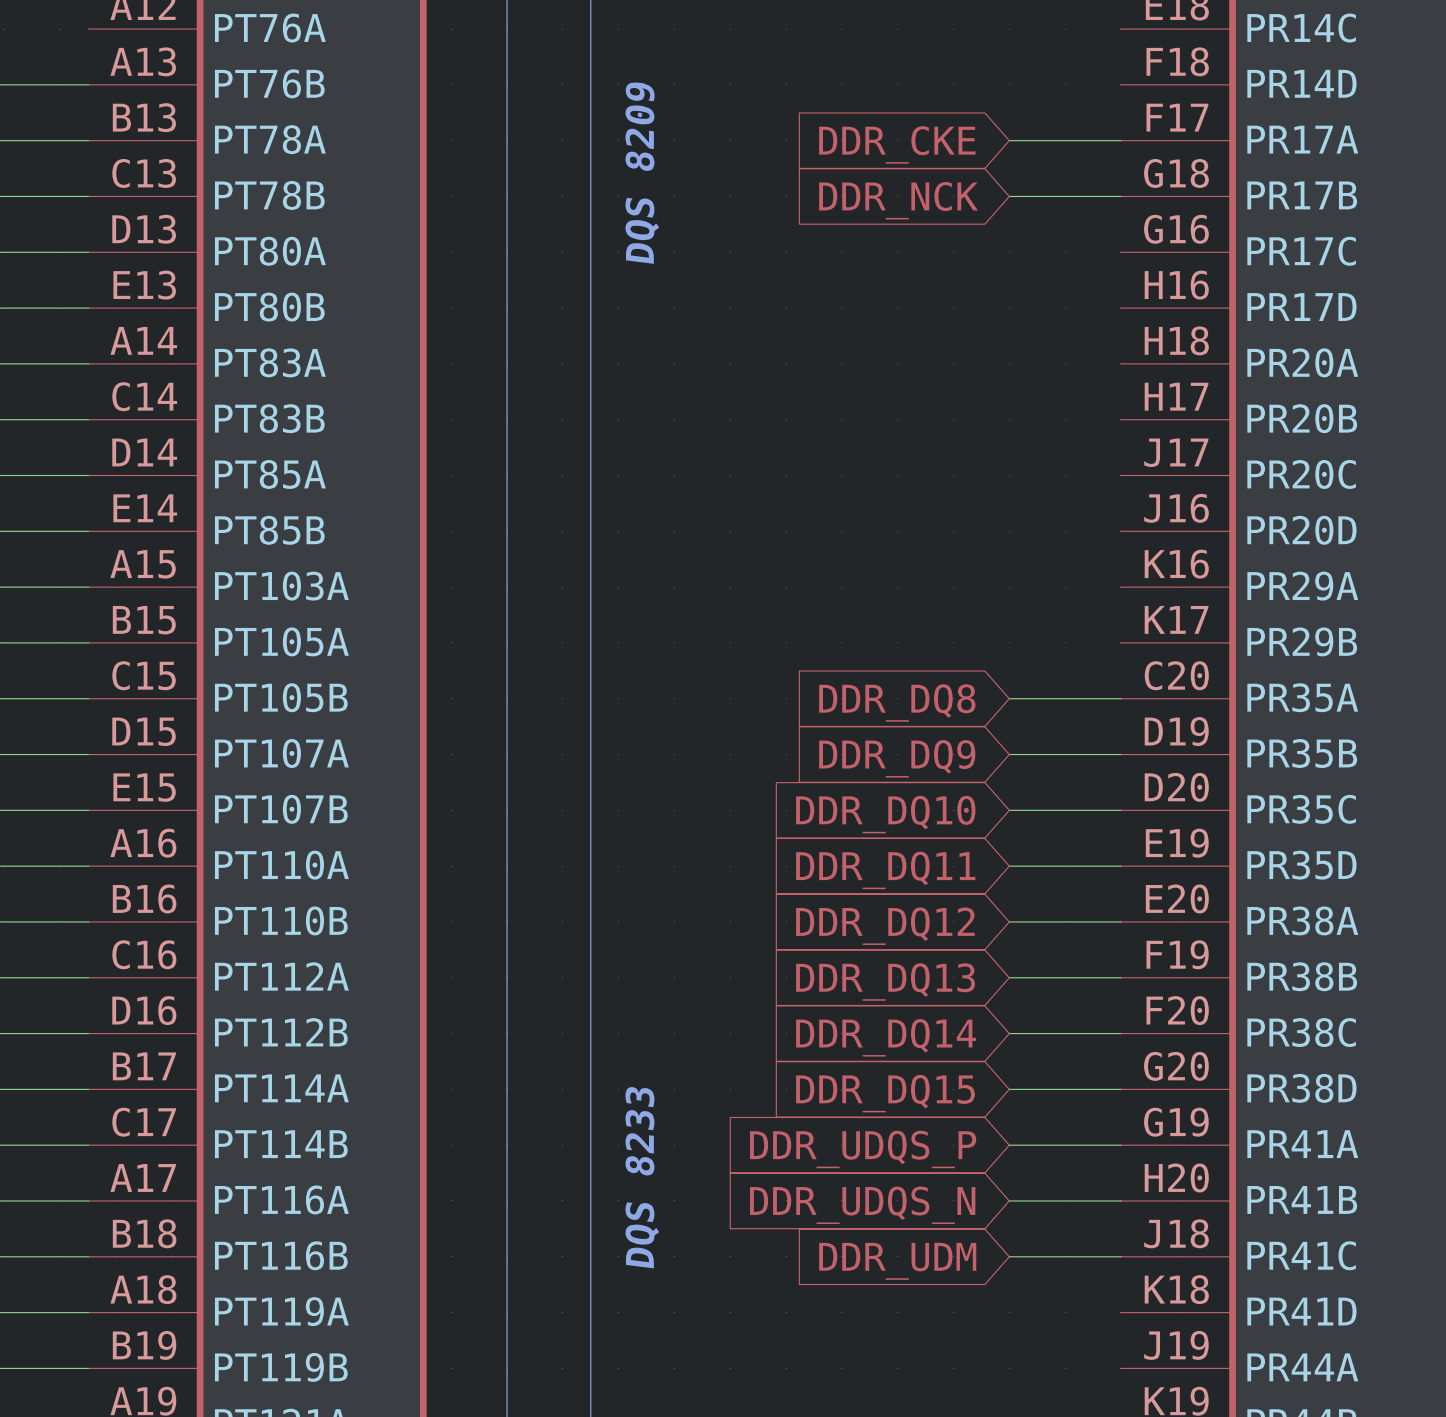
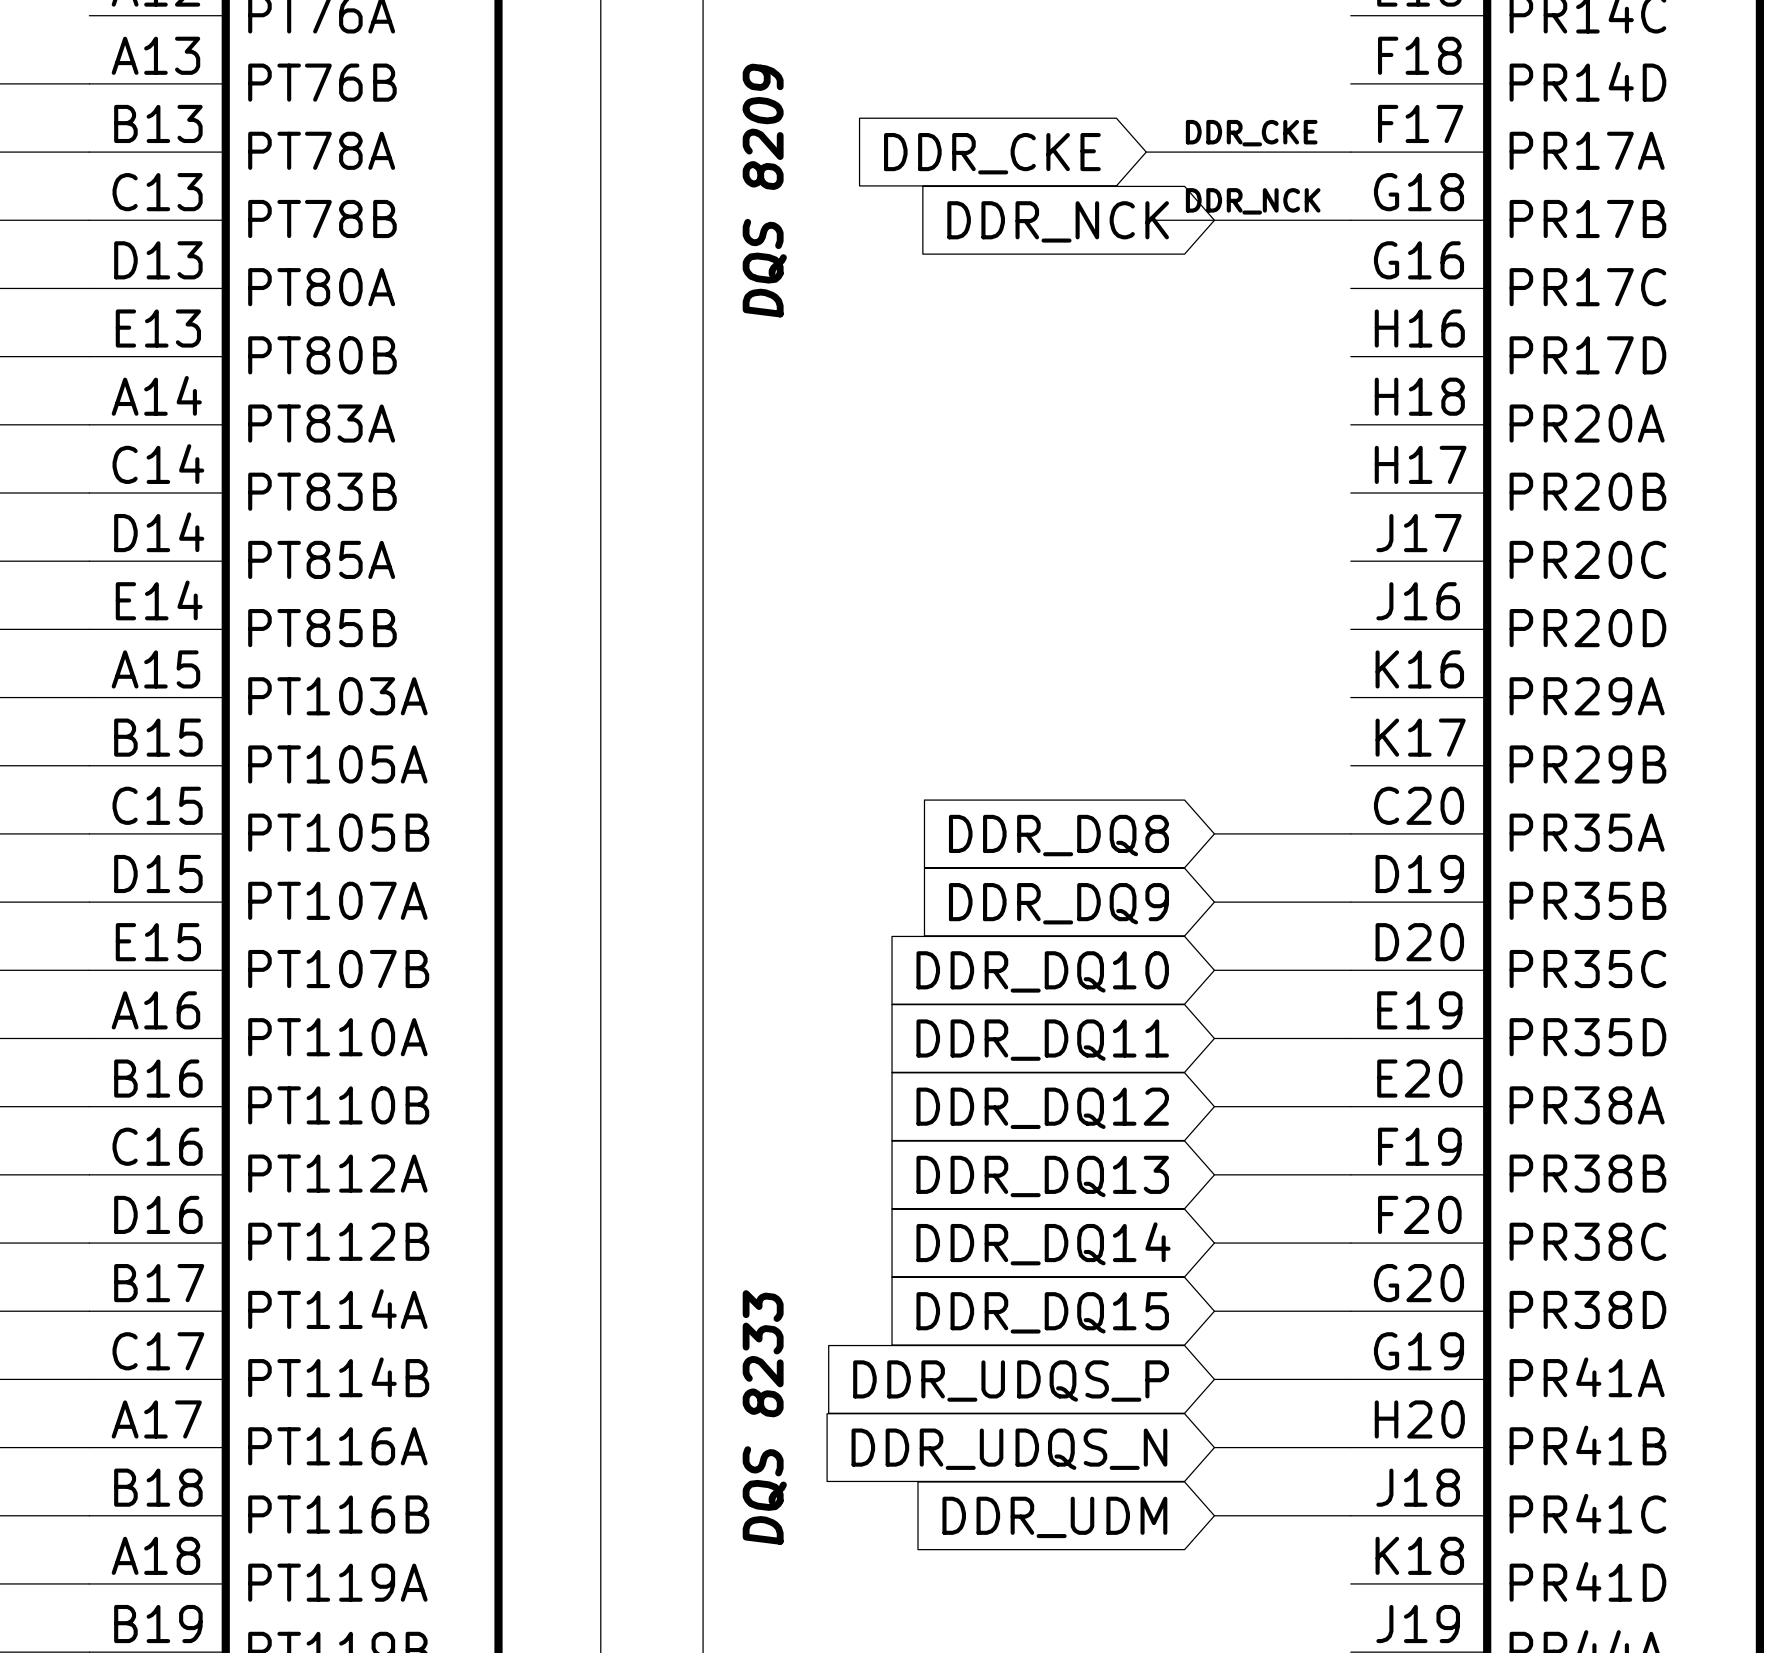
label: none -> DDR_CKE (1251, 133)
wire: none -> (1146, 152) (1214, 152)
global label position: DDR_CKE (897, 144) -> DDR_CKE (992, 153)
label: none -> DDR_NCK (1253, 201)
wire: none -> (1146, 220) (1214, 220)

